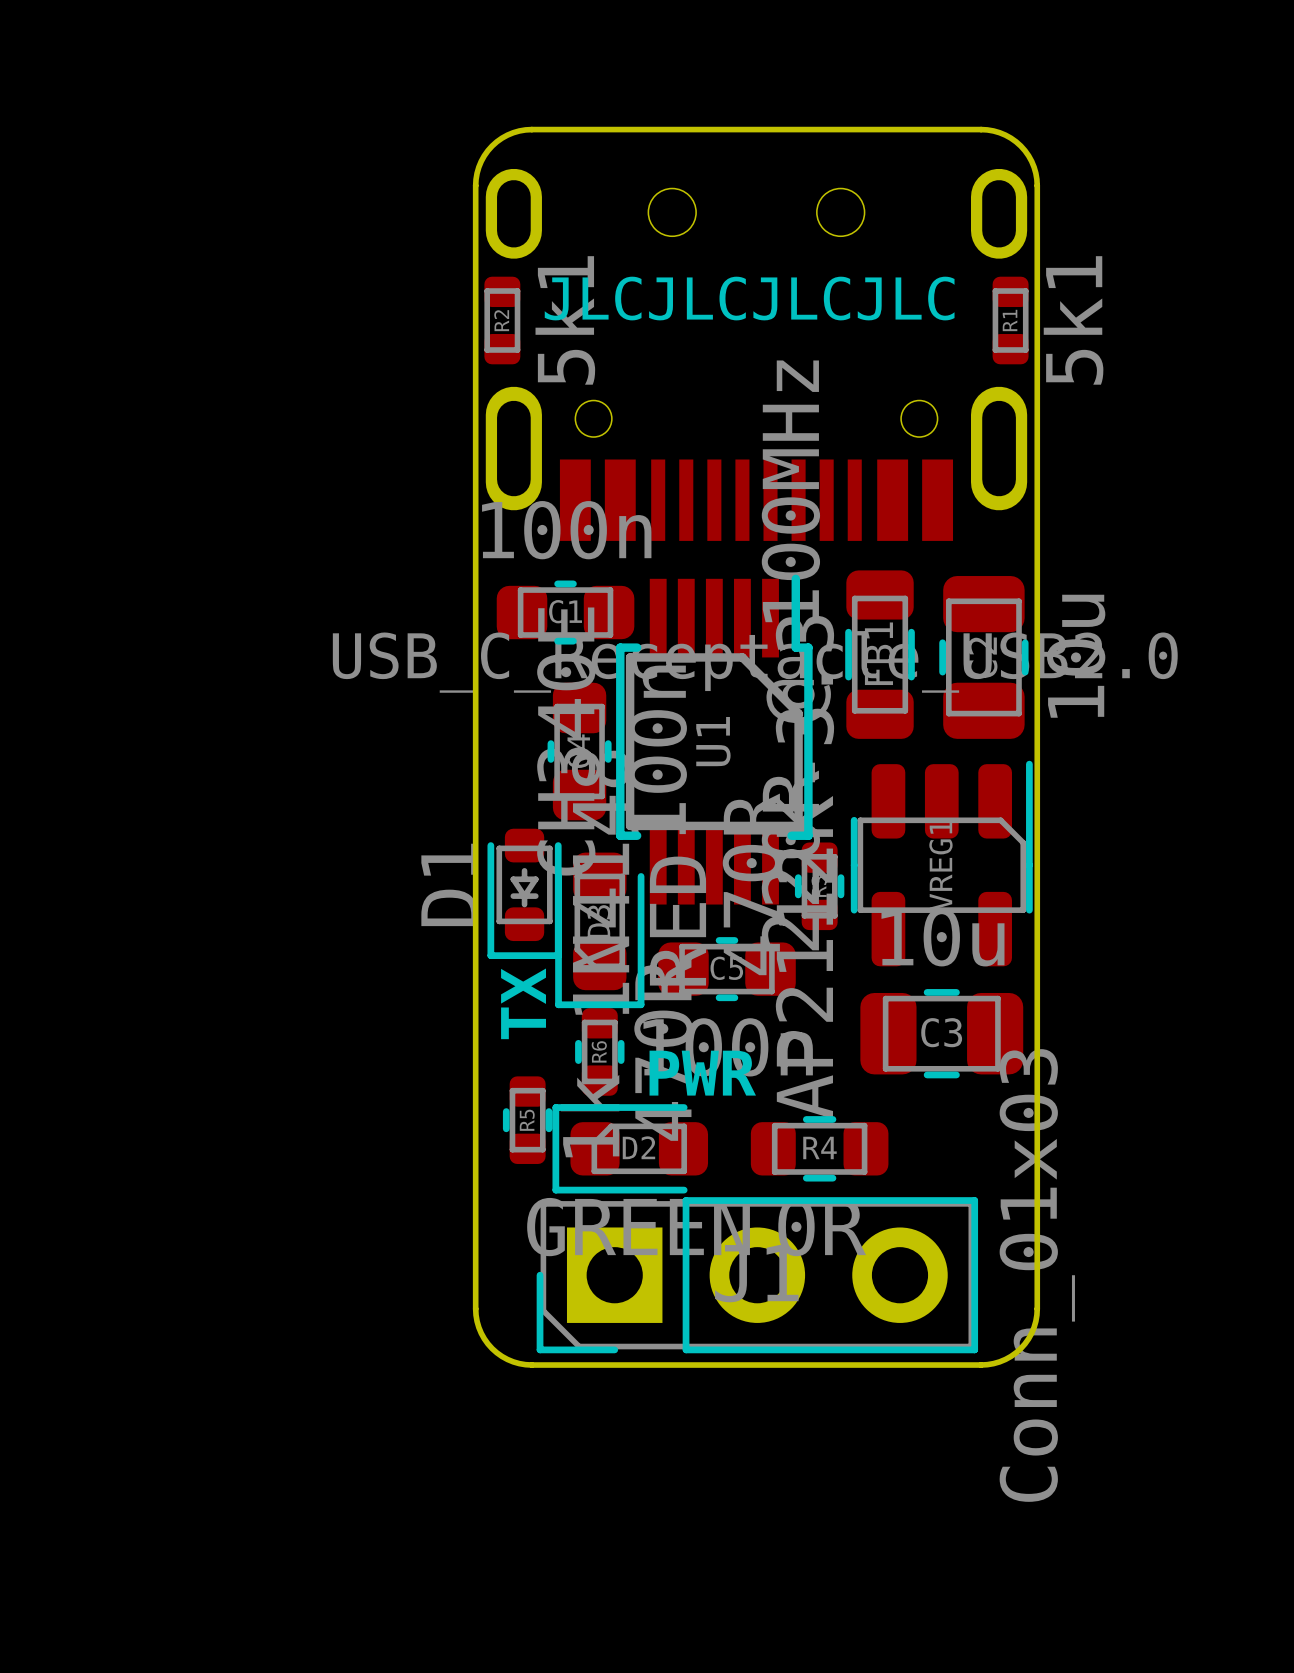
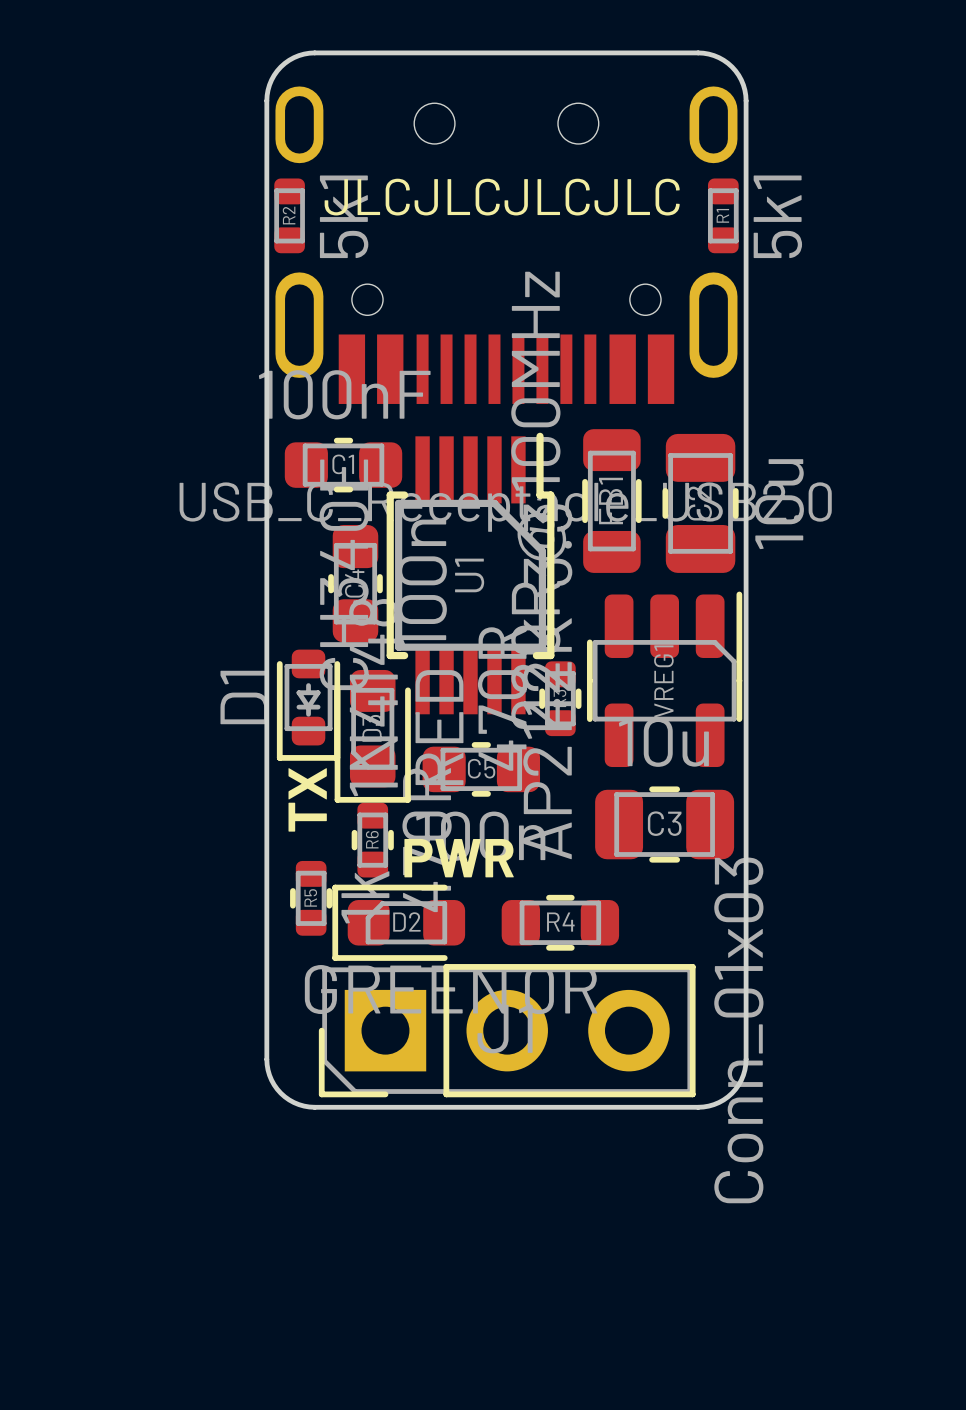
C1 value: 100n (566, 530) -> 100nF (344, 394)

